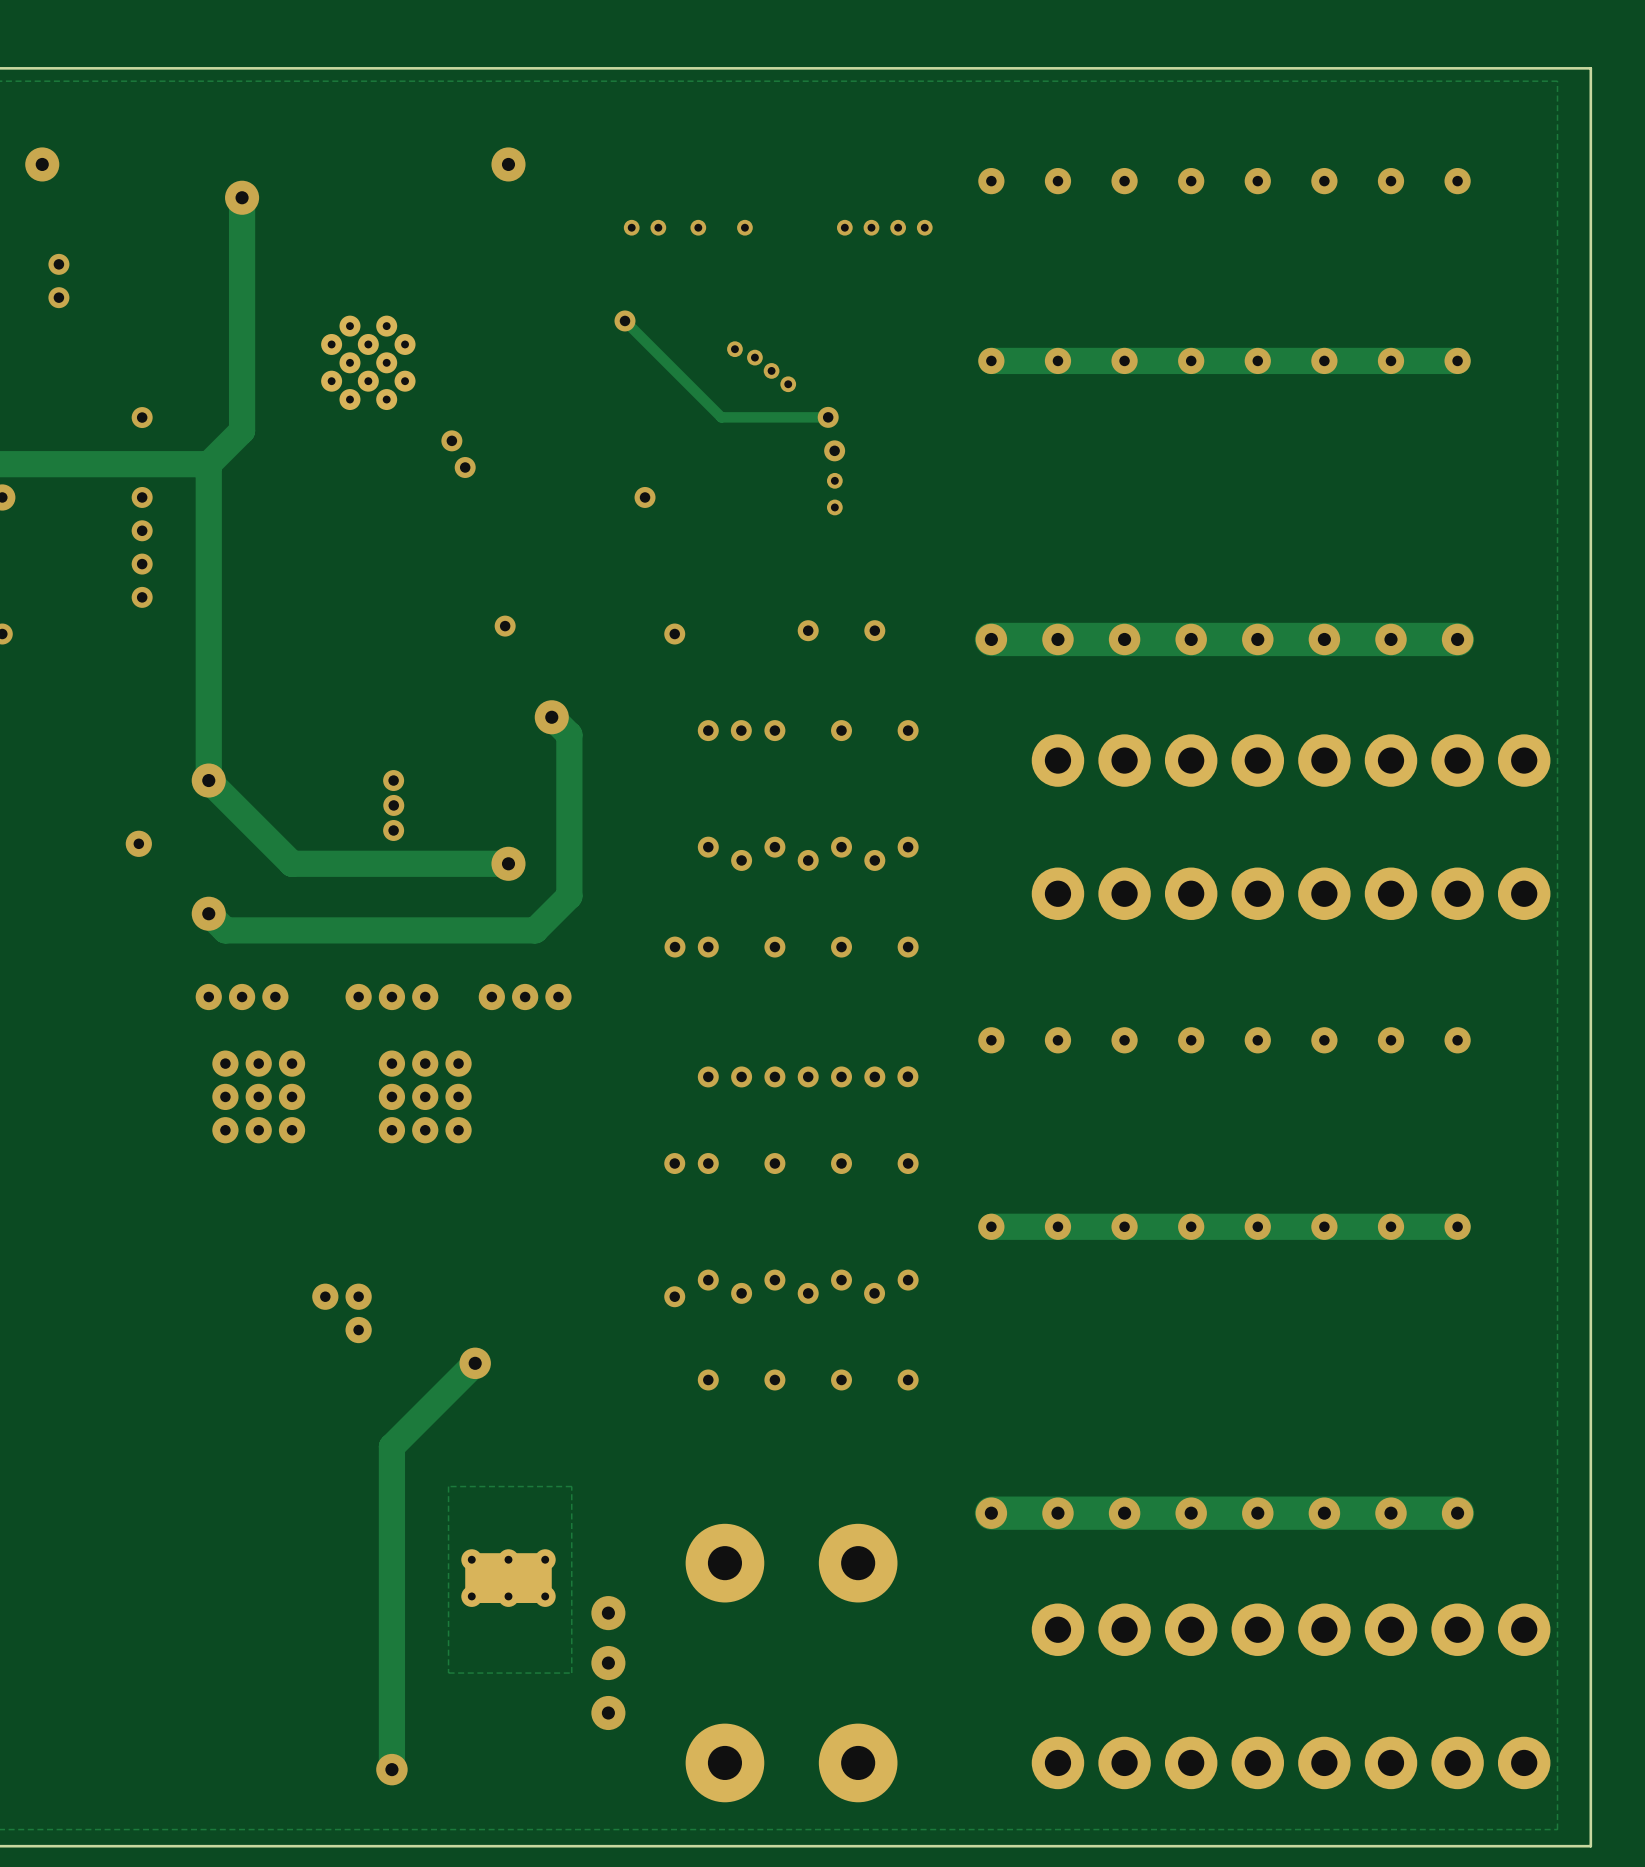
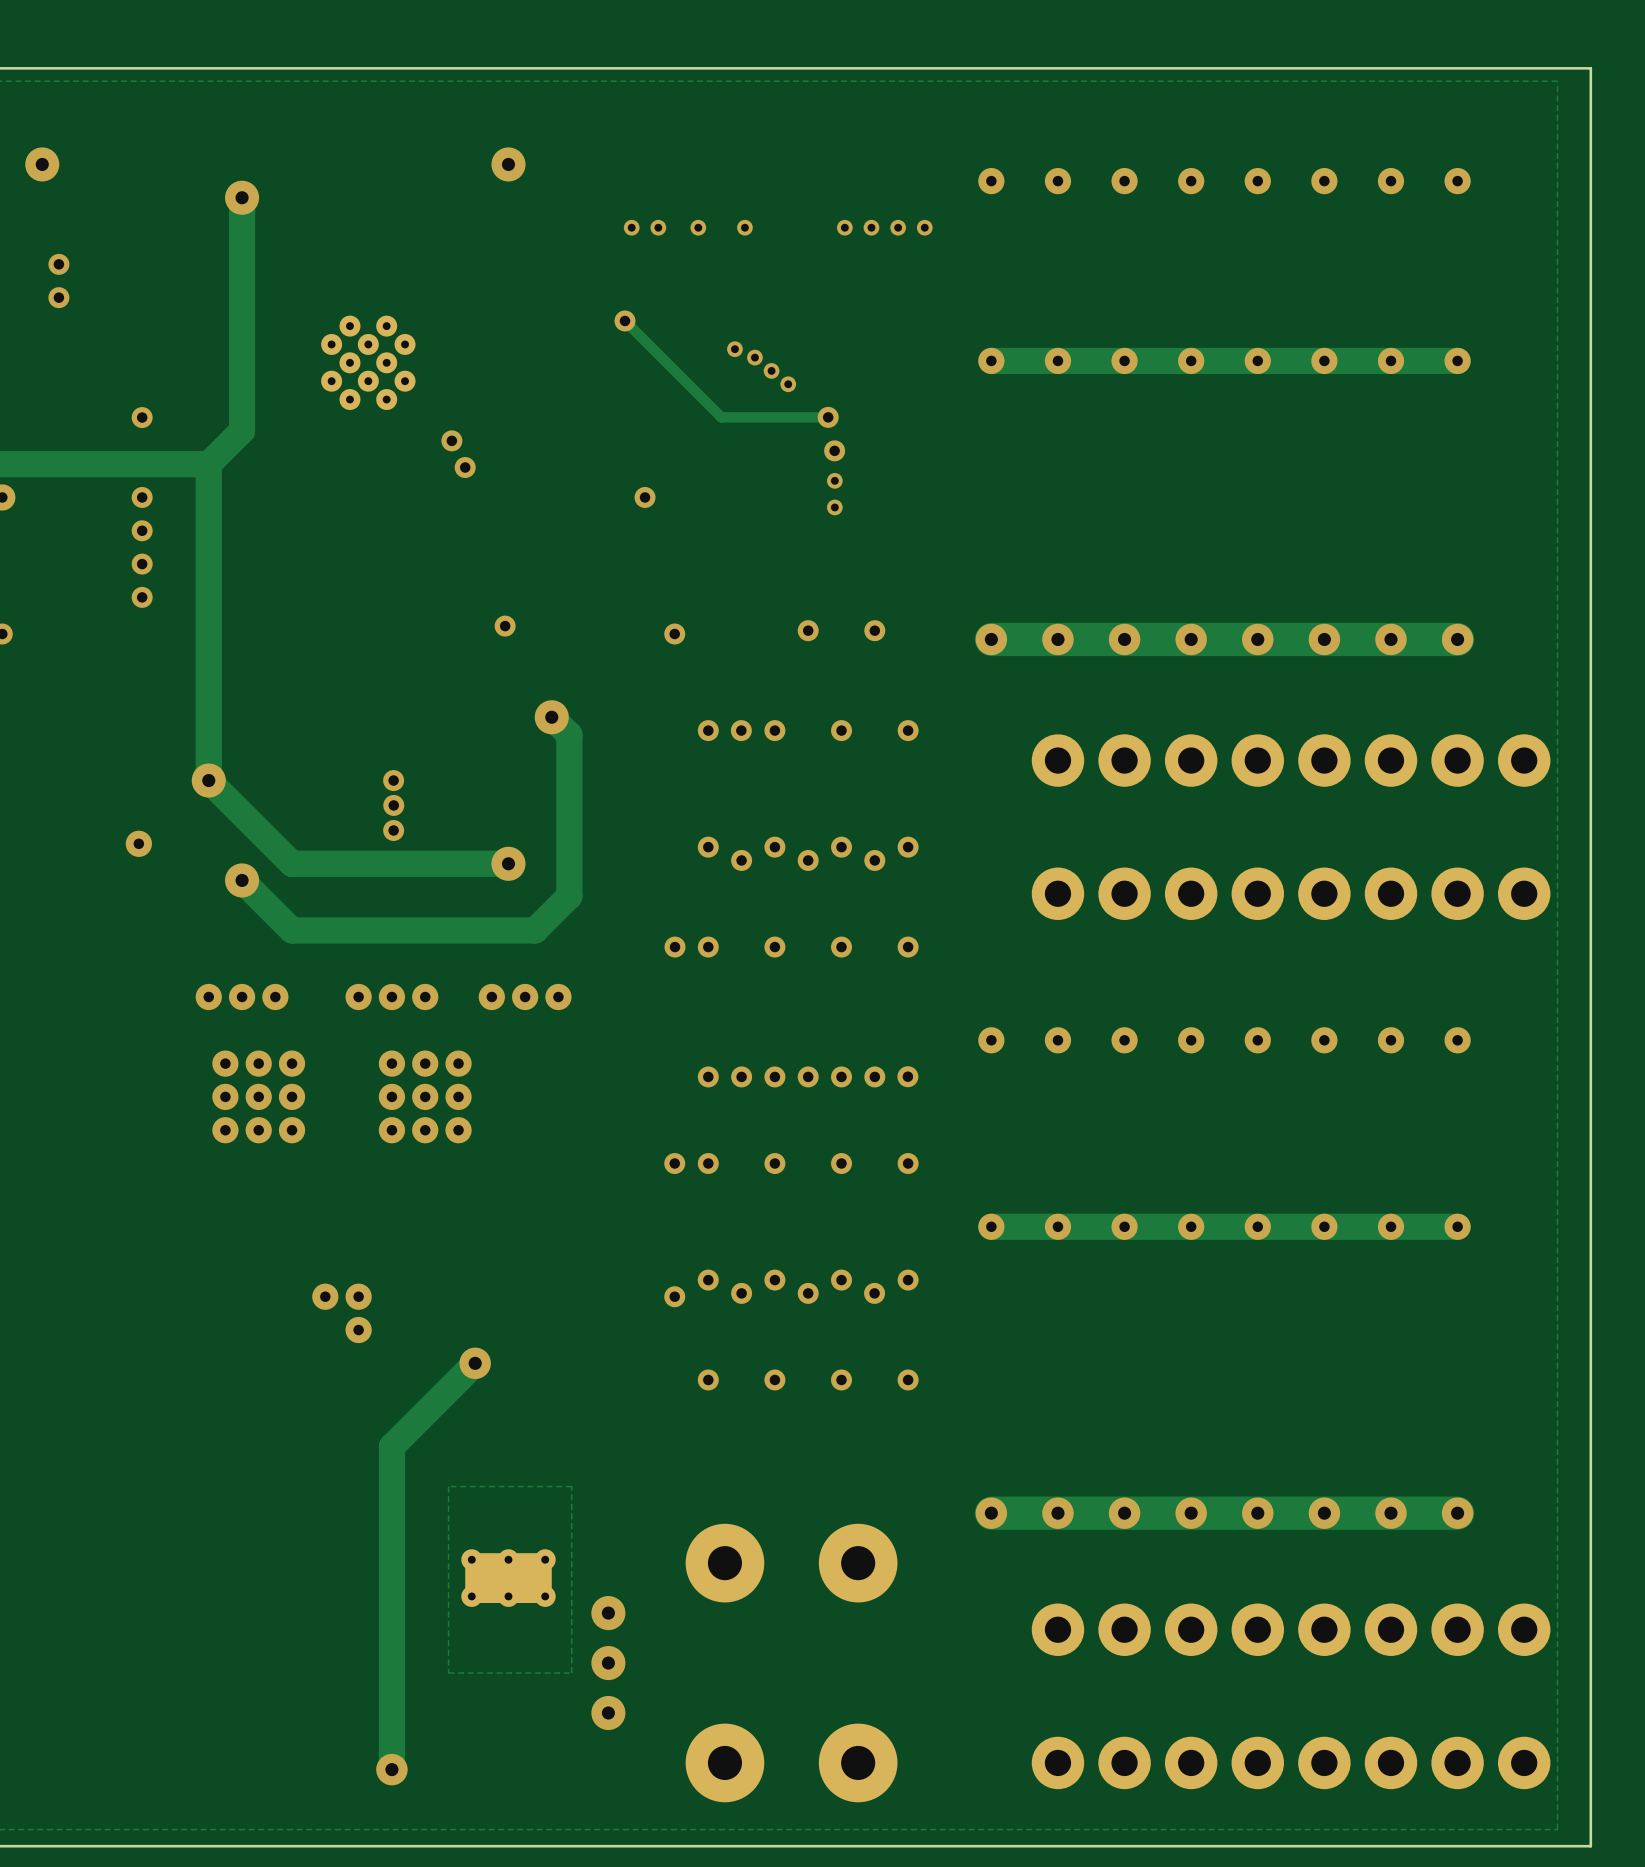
track: (208, 913) (225, 930) (292, 930) -> (242, 880) (292, 930)
via position: (208, 913) -> (242, 880)

